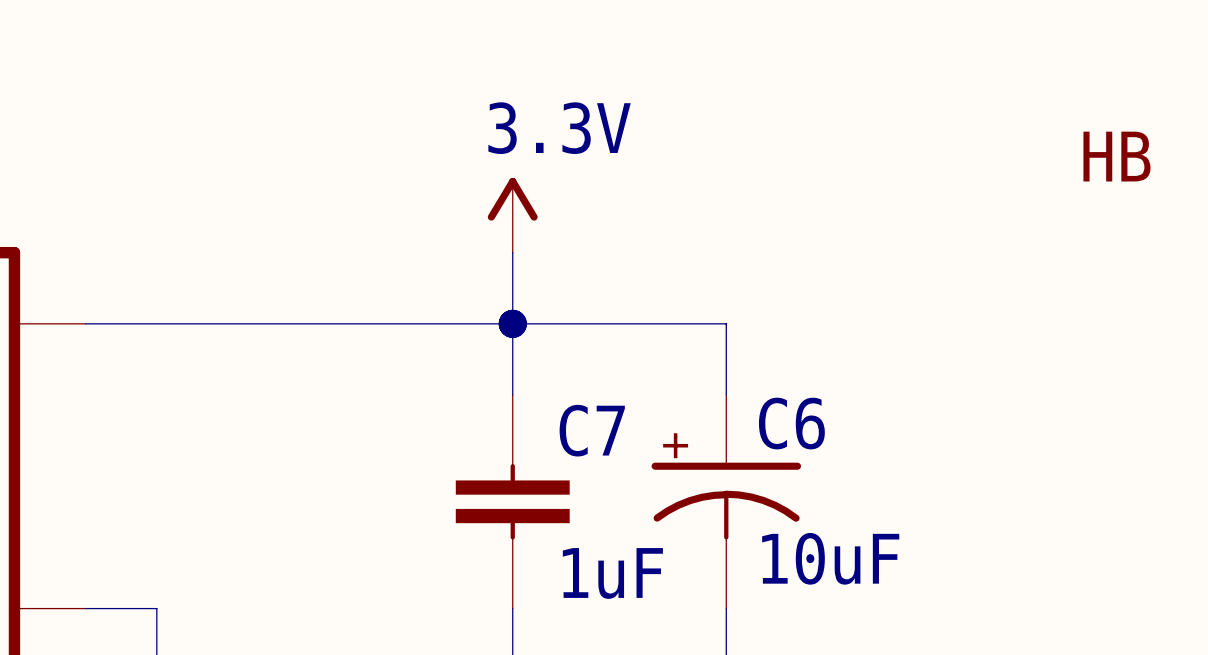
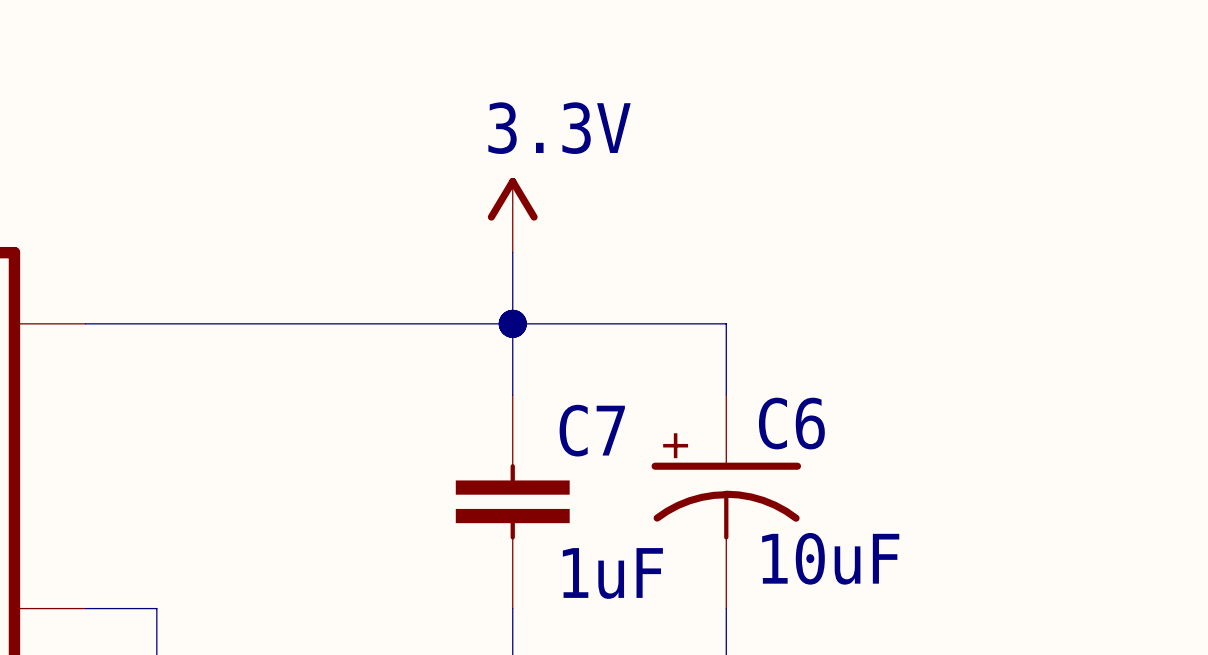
label: HB (1116, 156) -> none

